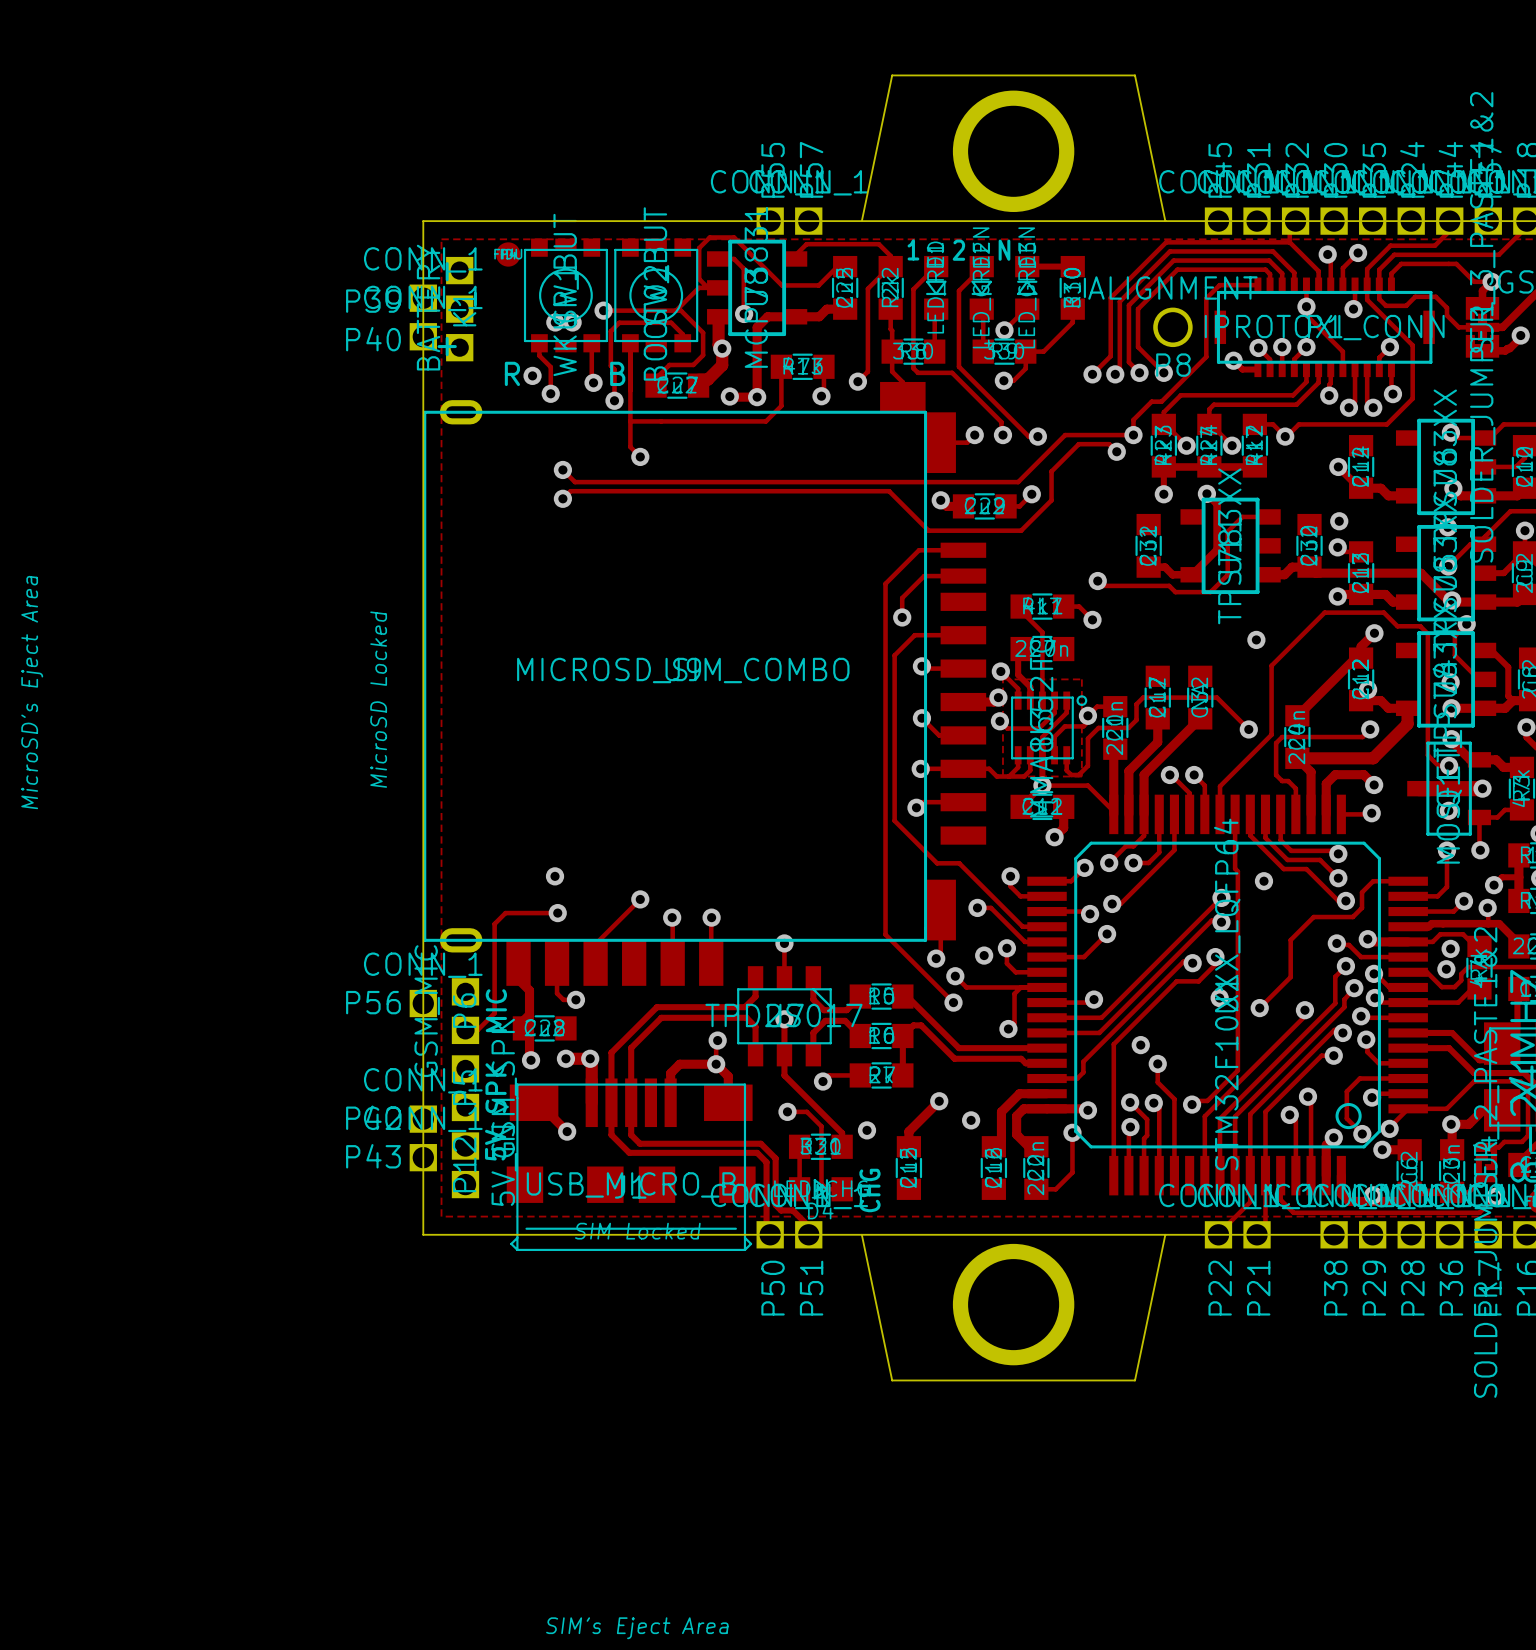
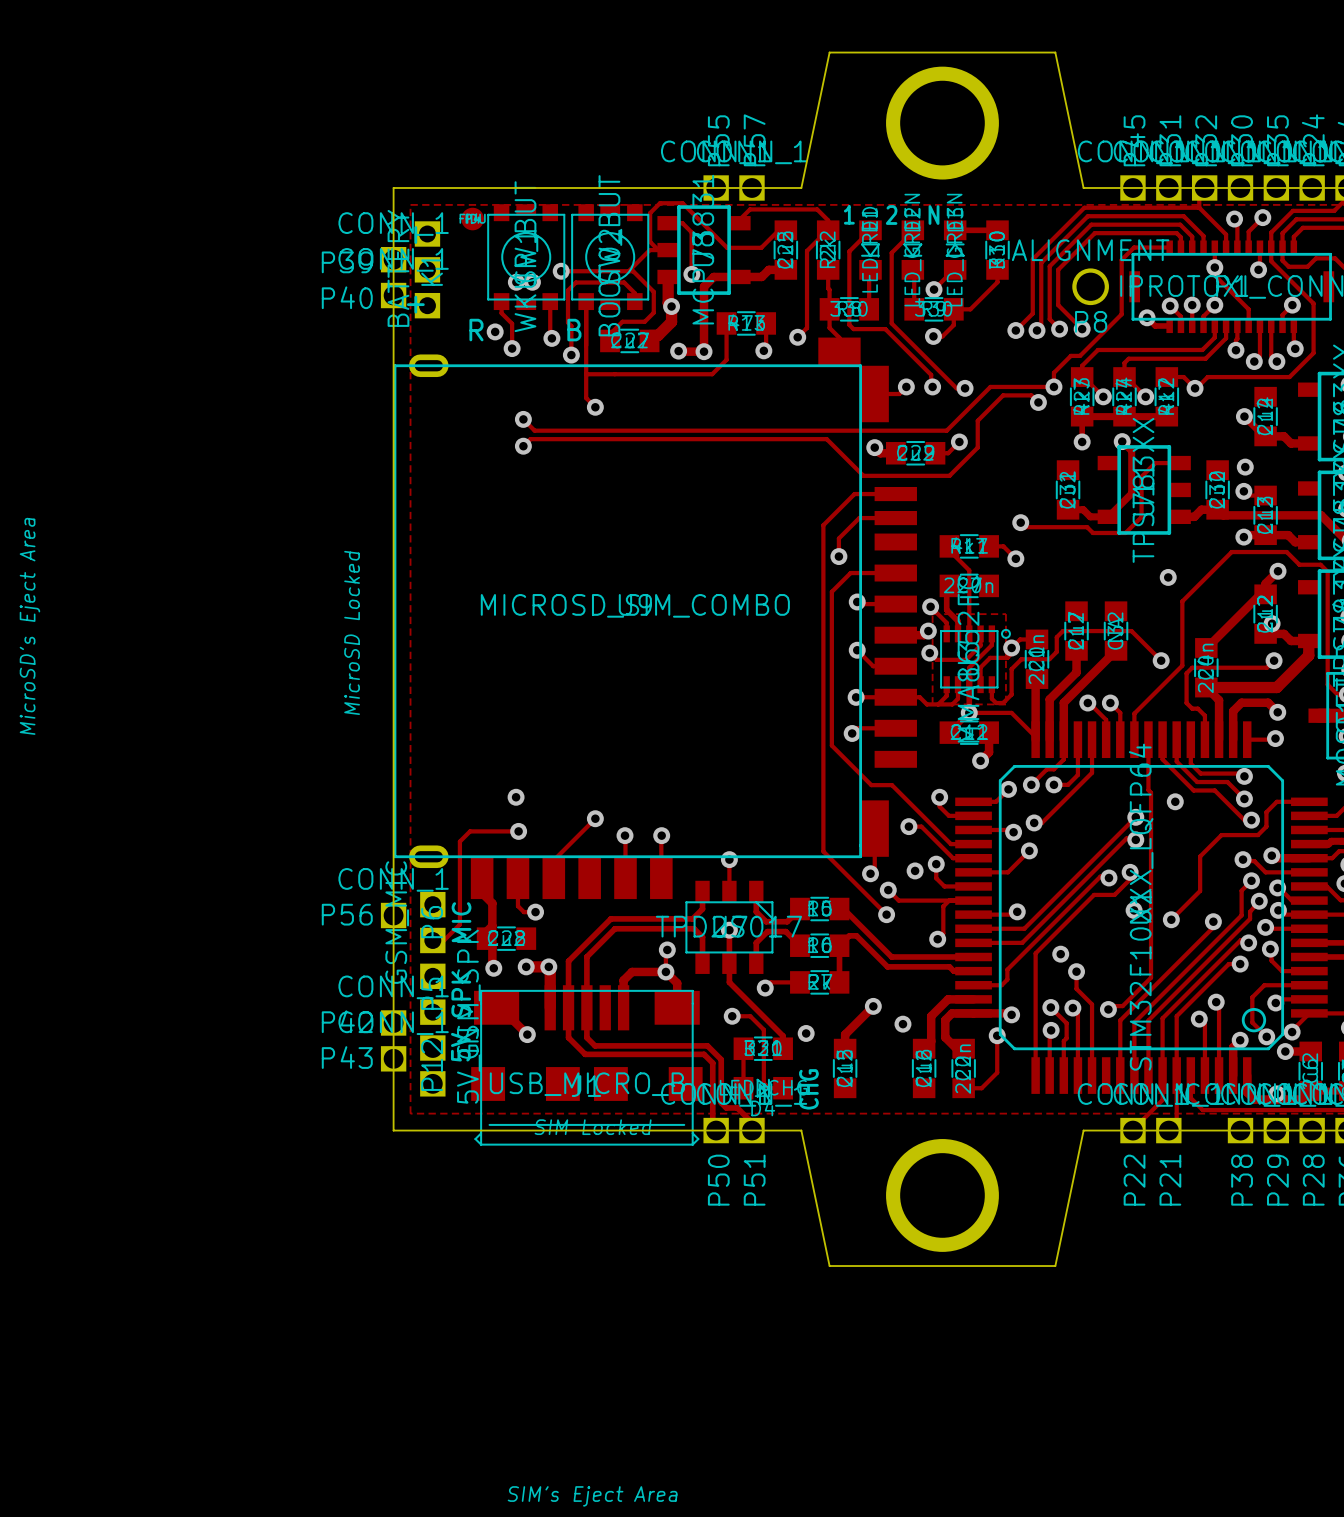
board edge: (861, 221) (1165, 221) -> none
board edge: (861, 1234) (1165, 1234) -> none

